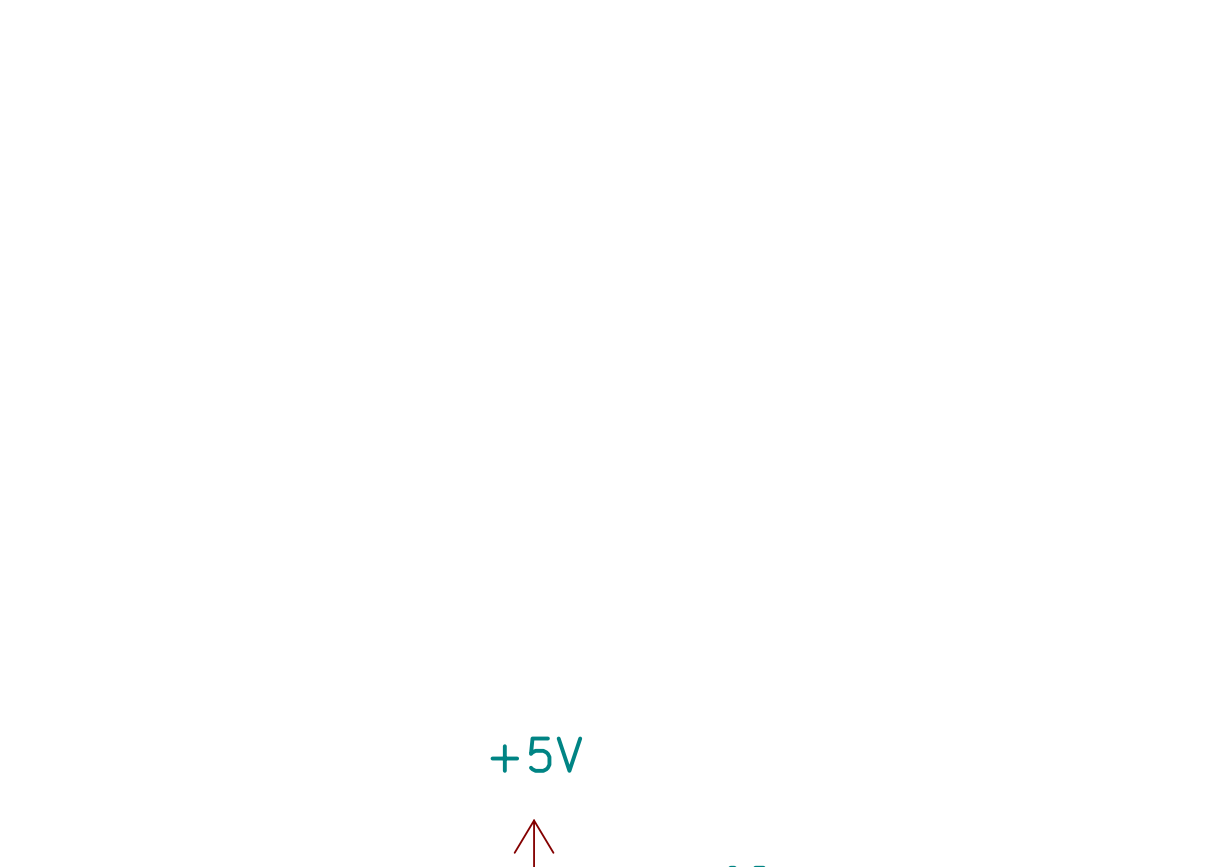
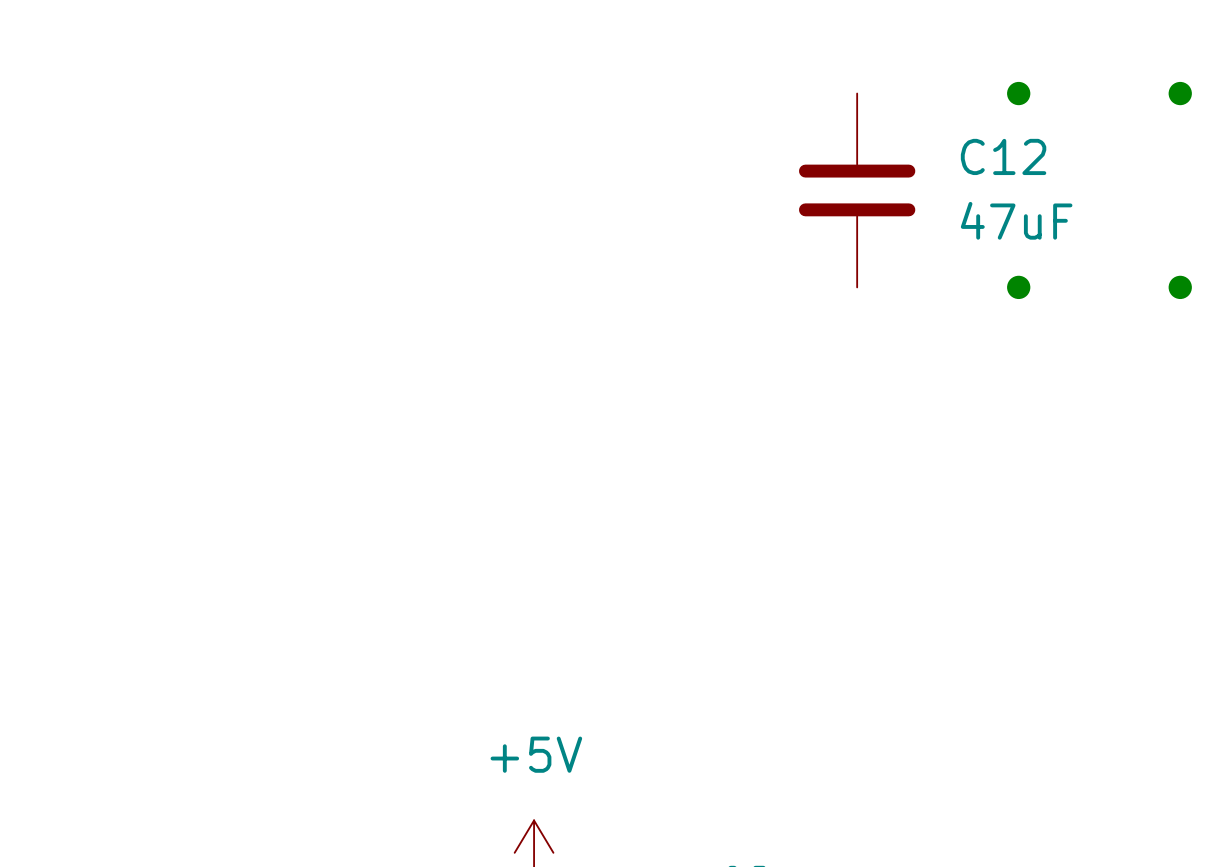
junction: none -> (1018, 93)
junction: none -> (1180, 93)
C12: none -> 47uF (857, 190)
junction: none -> (1018, 287)
junction: none -> (1180, 287)

